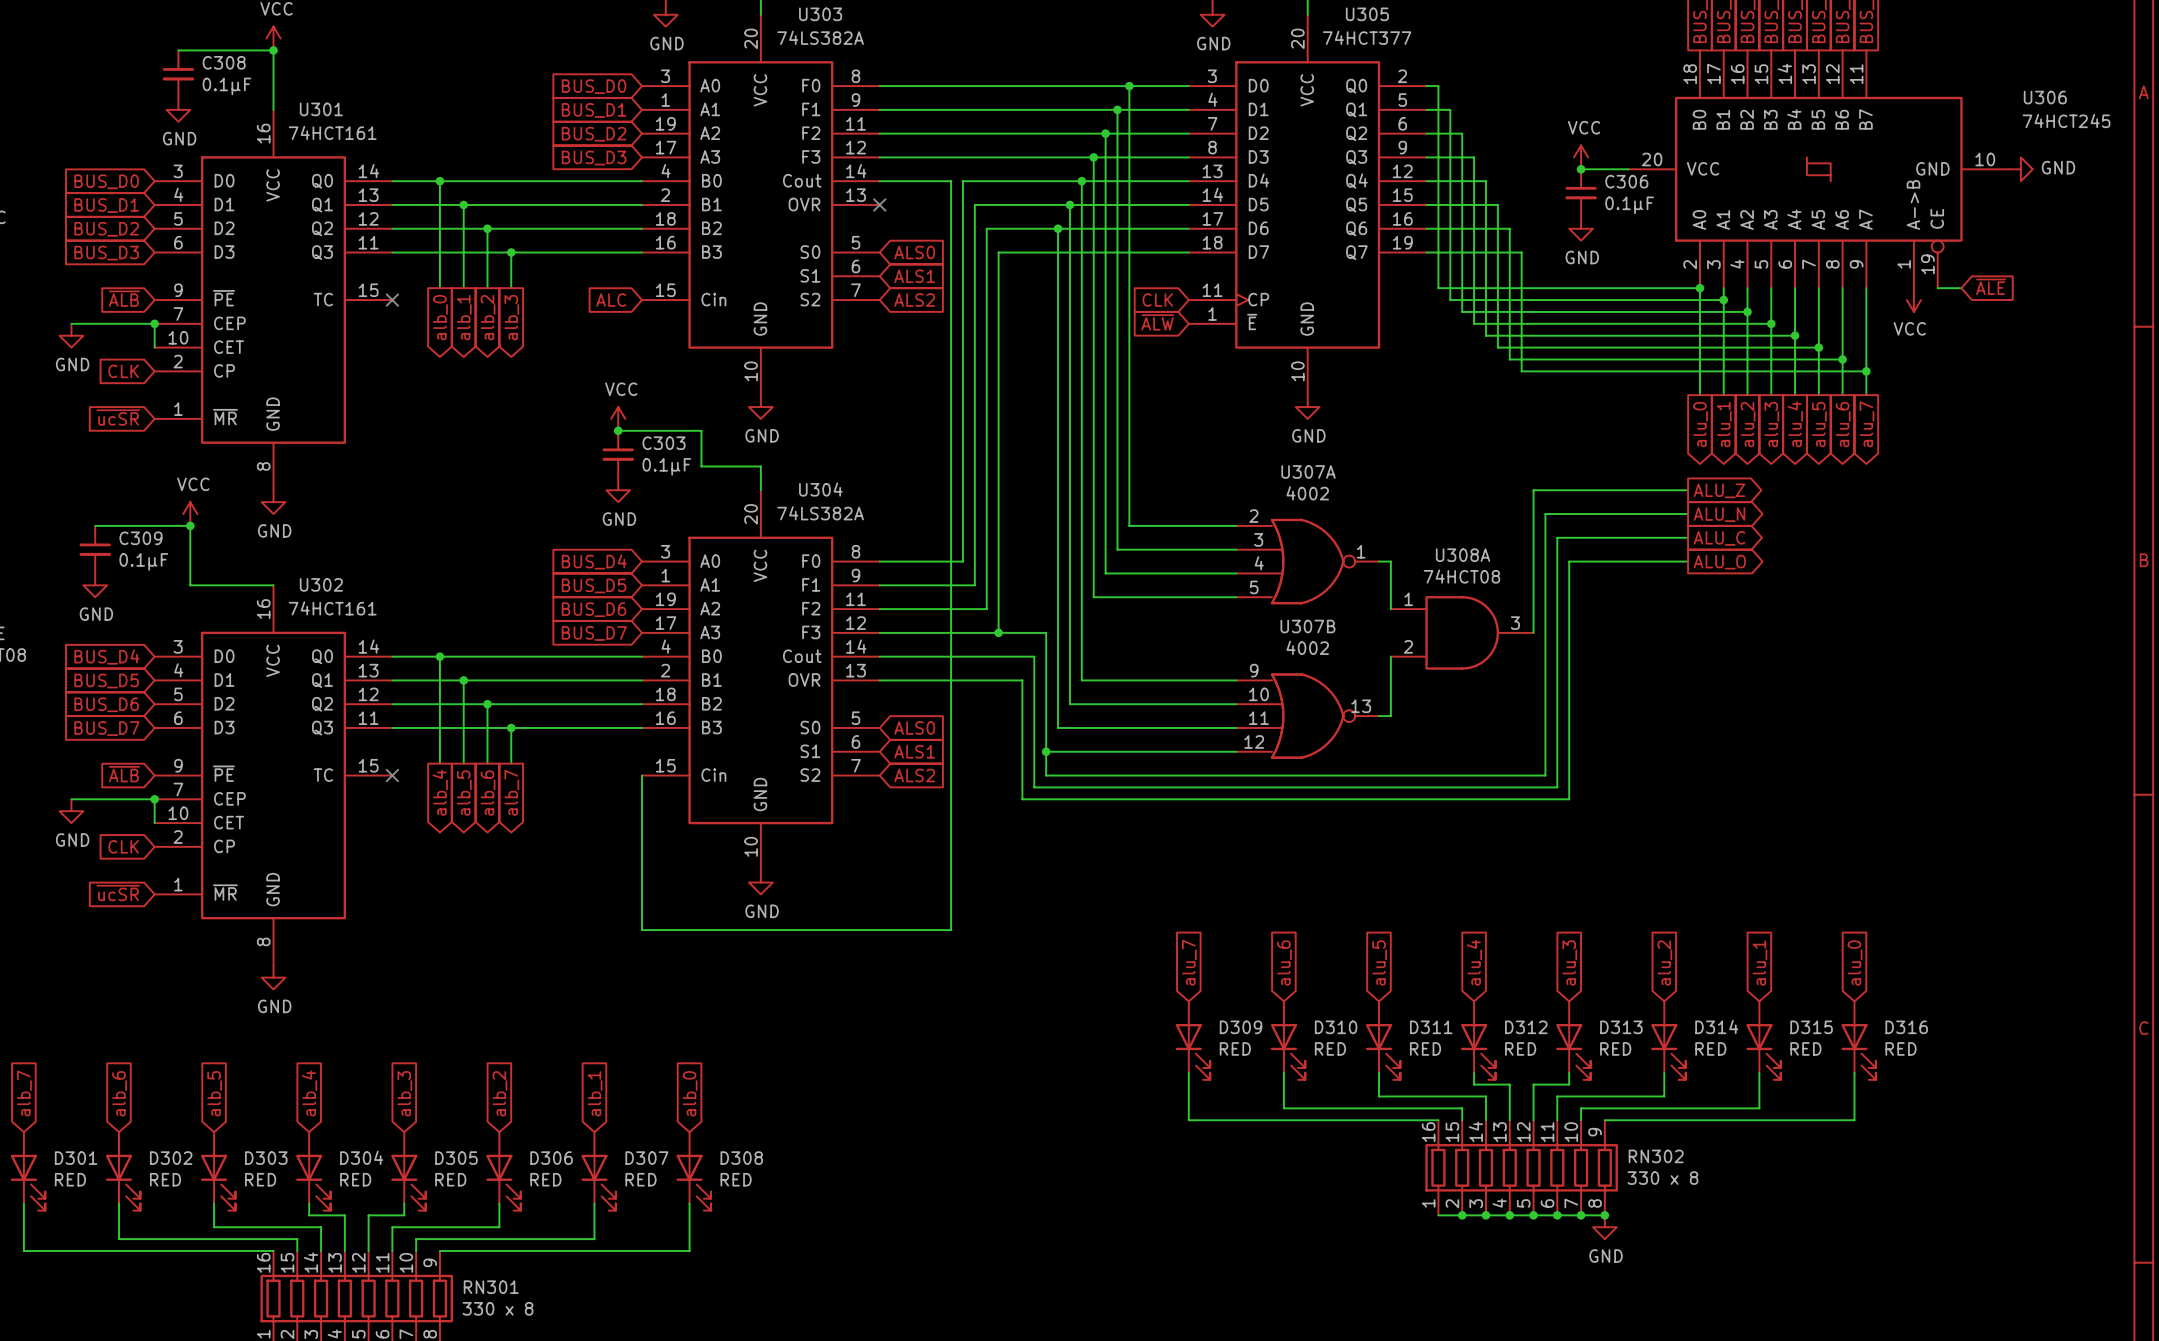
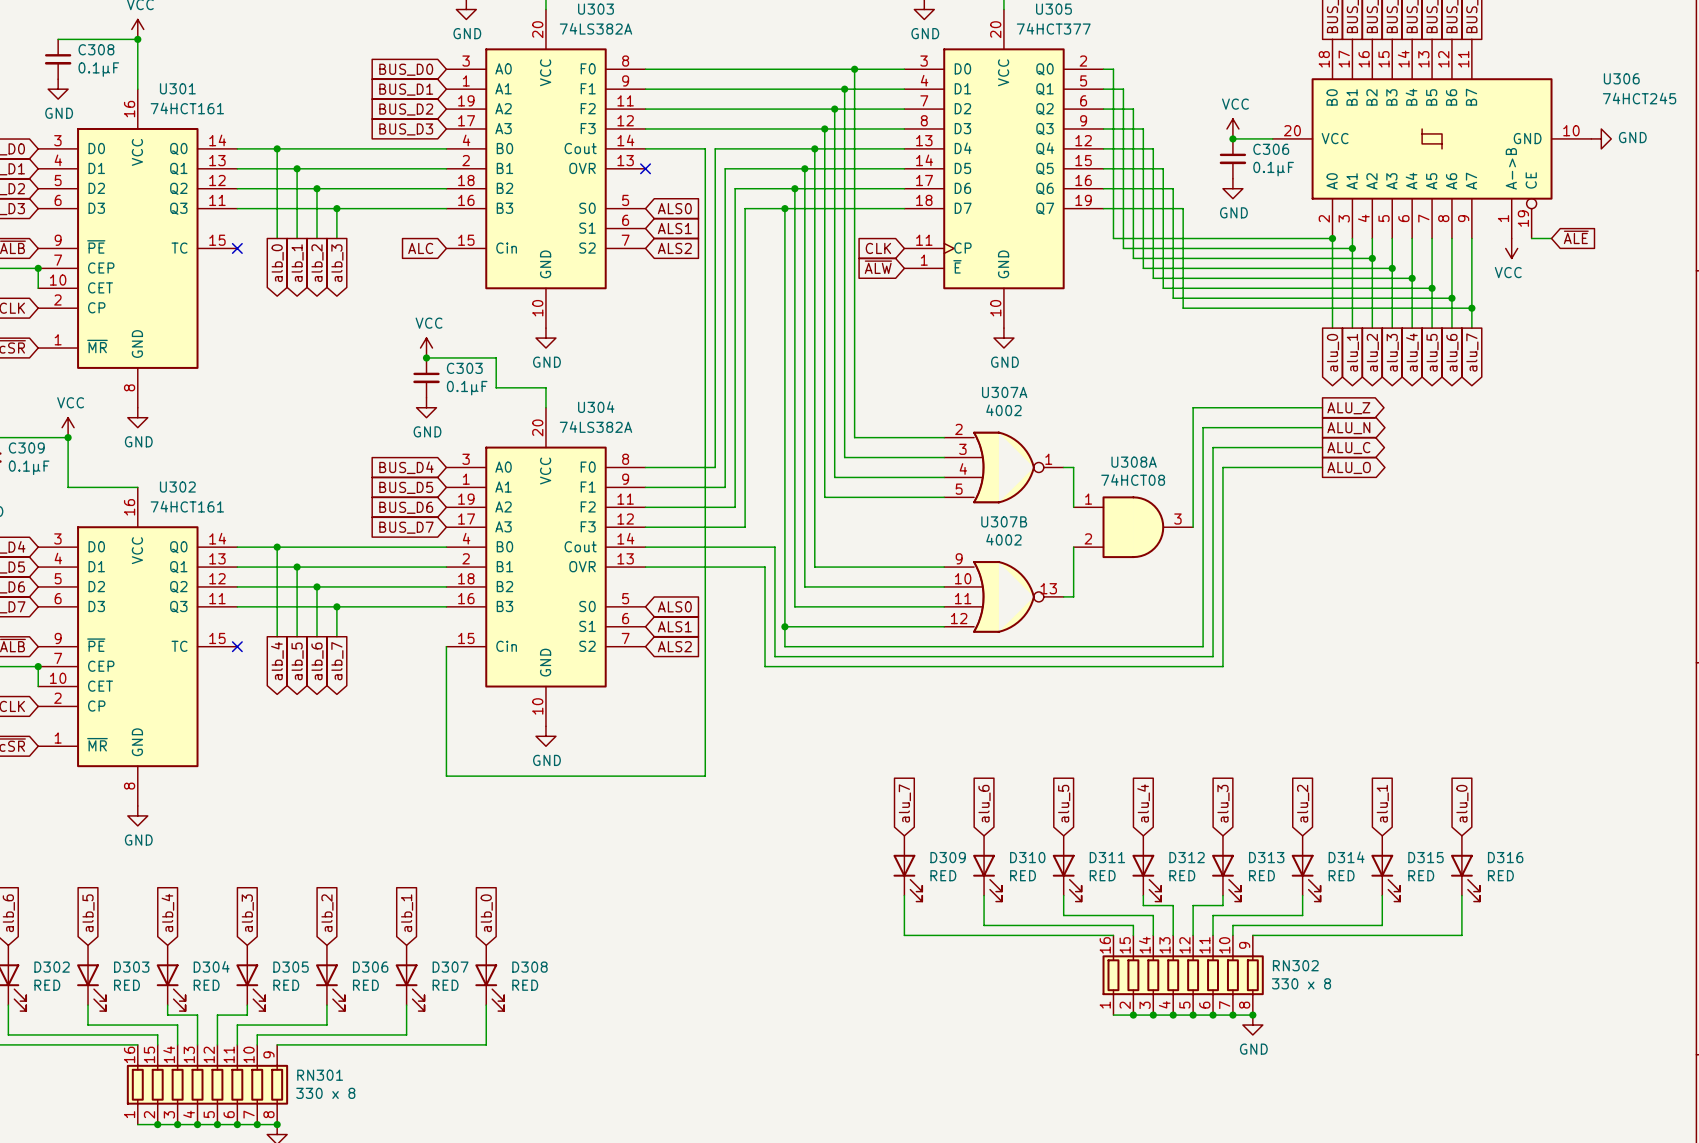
junction: none -> (784, 208)
wire: (998, 632) (1046, 632) -> (784, 208) (784, 527)
junction: (998, 632) -> none

